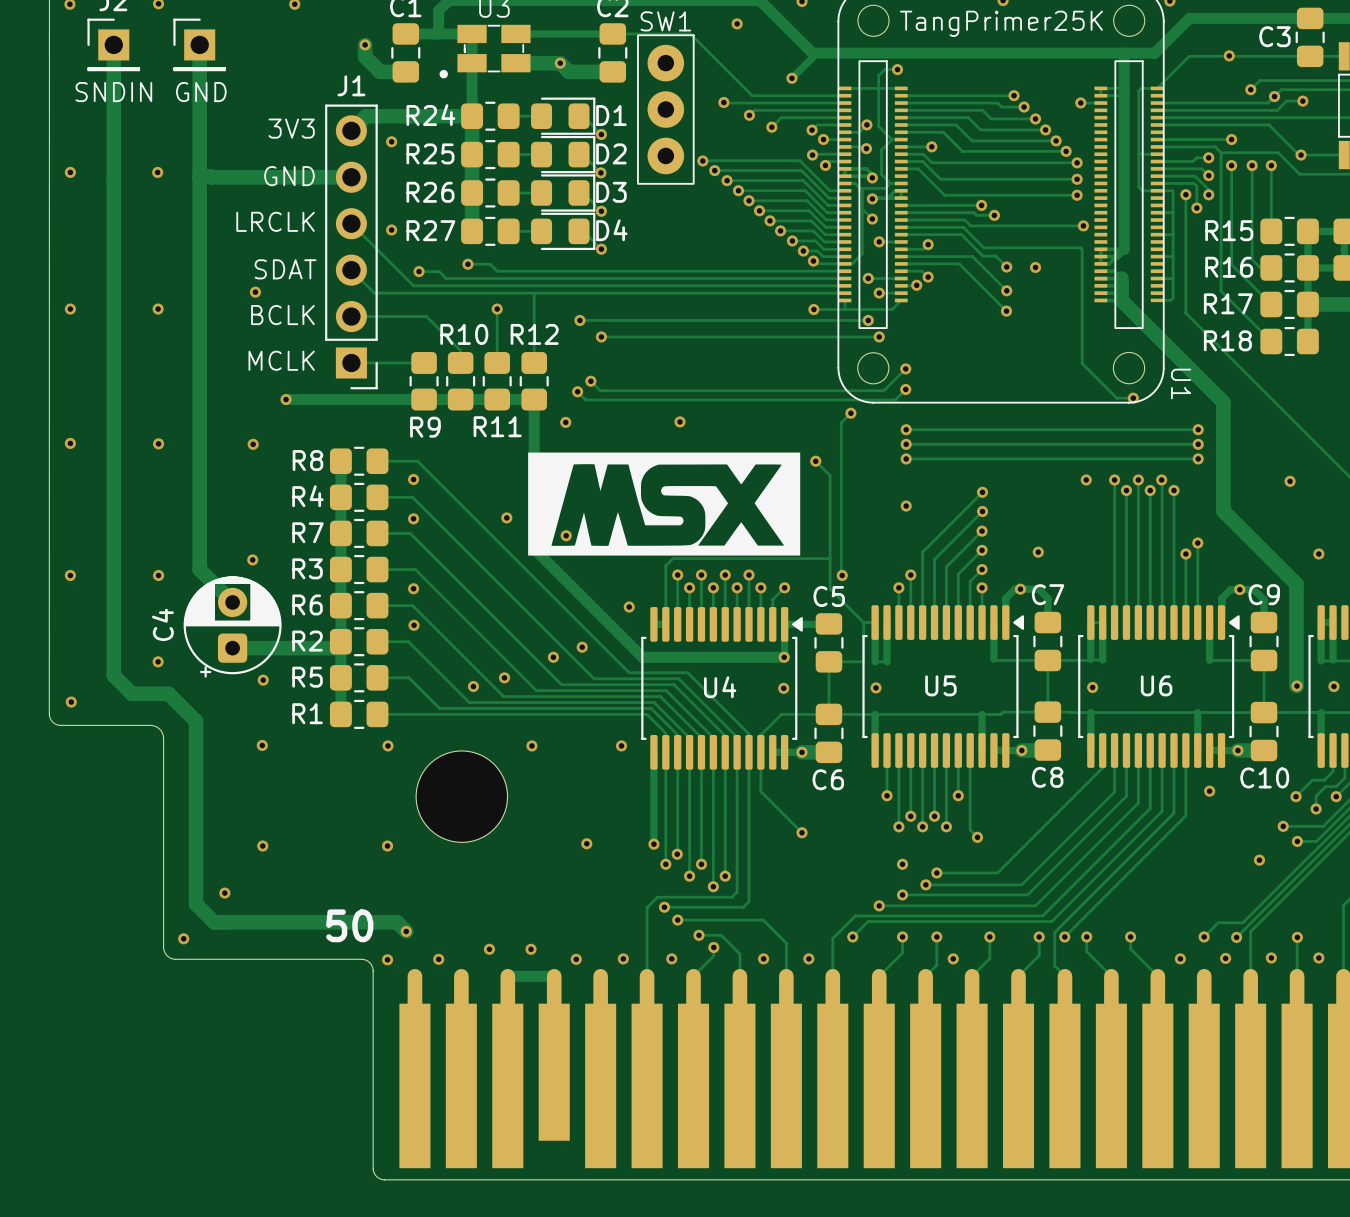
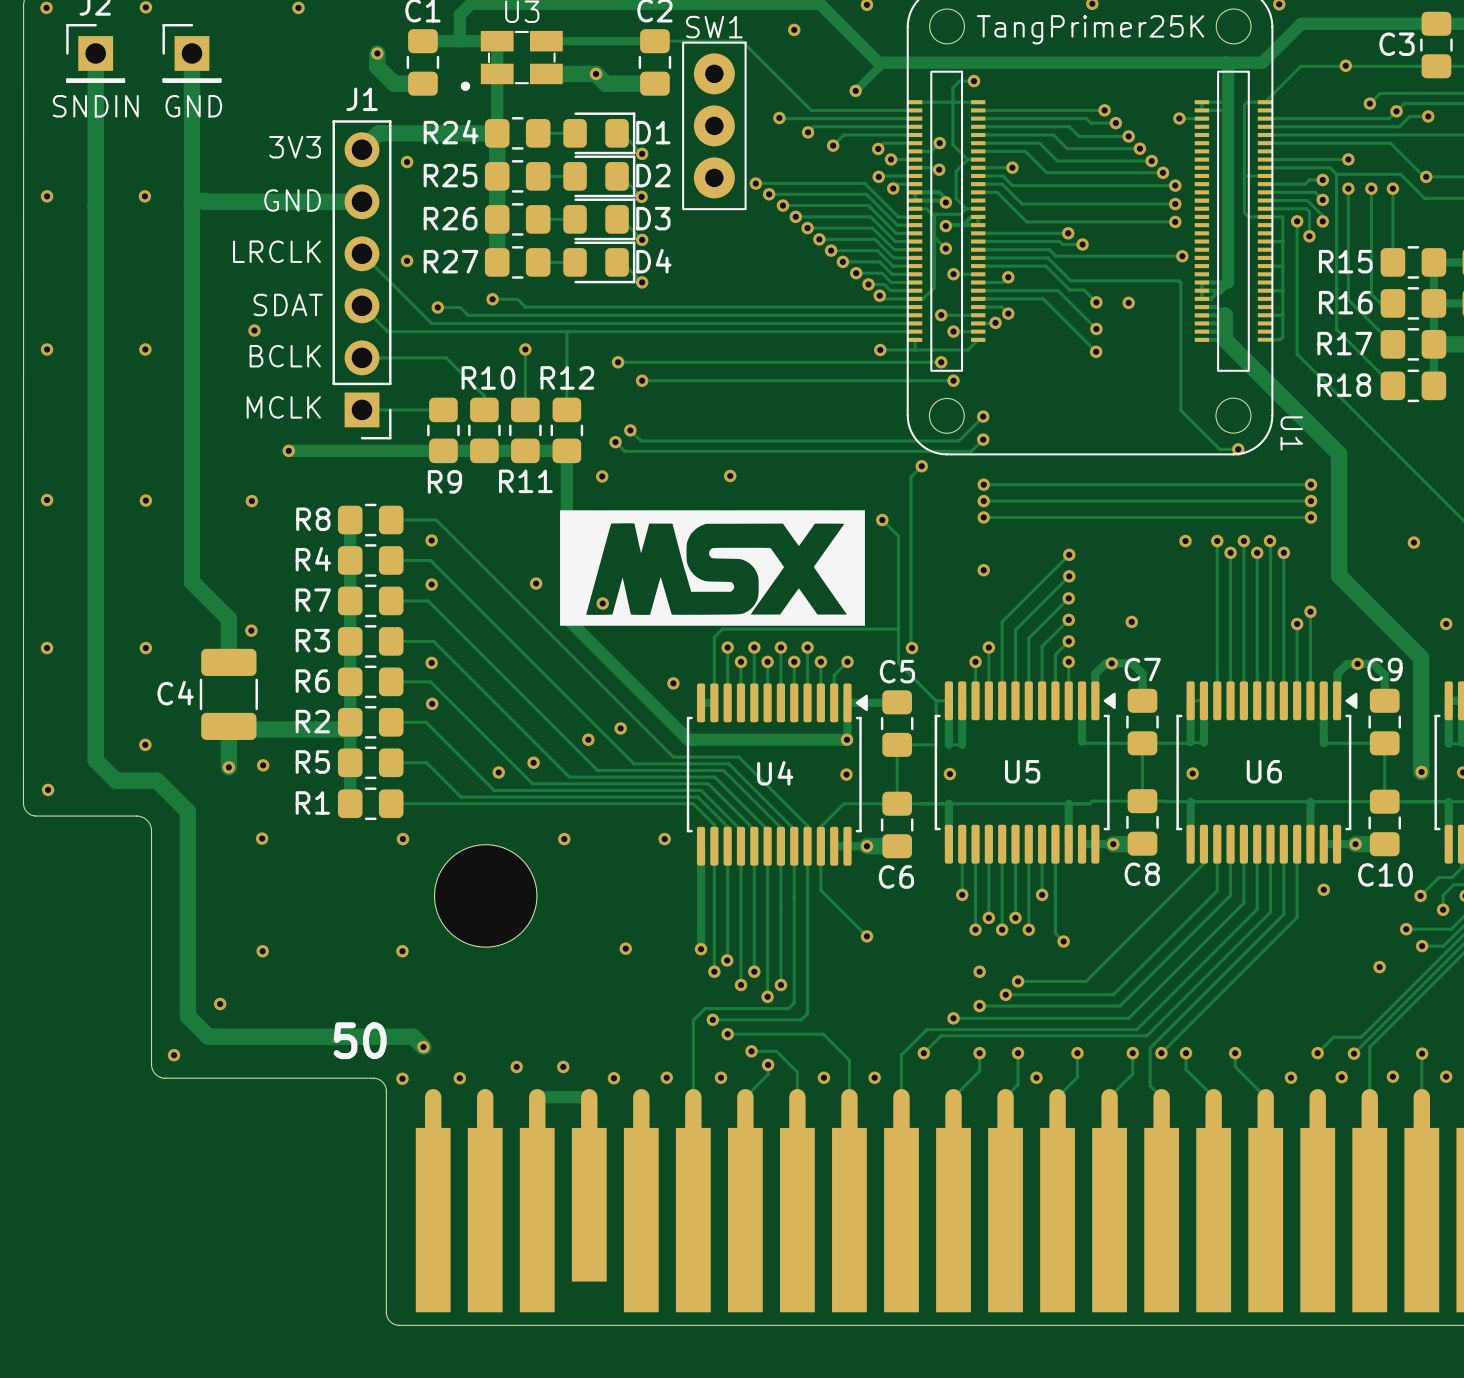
track: (199, 516) (199, 569) (232, 602) -> (191, 581) (228, 618) (228, 662)
C4 footprint: [183, 576, 282, 678] -> [199, 648, 258, 740]
track: none -> (228, 726) (228, 767)
via: none -> (228, 767)

